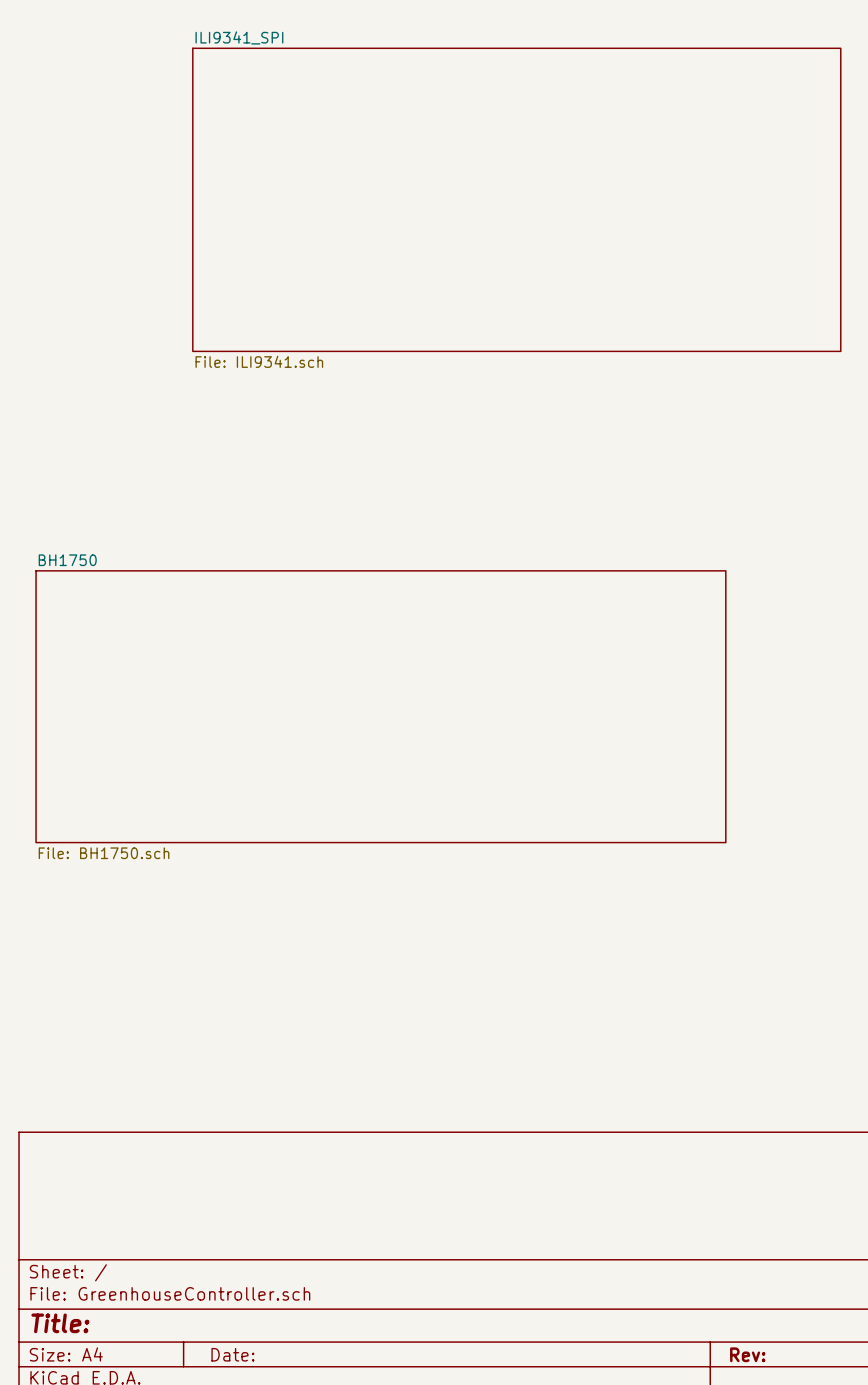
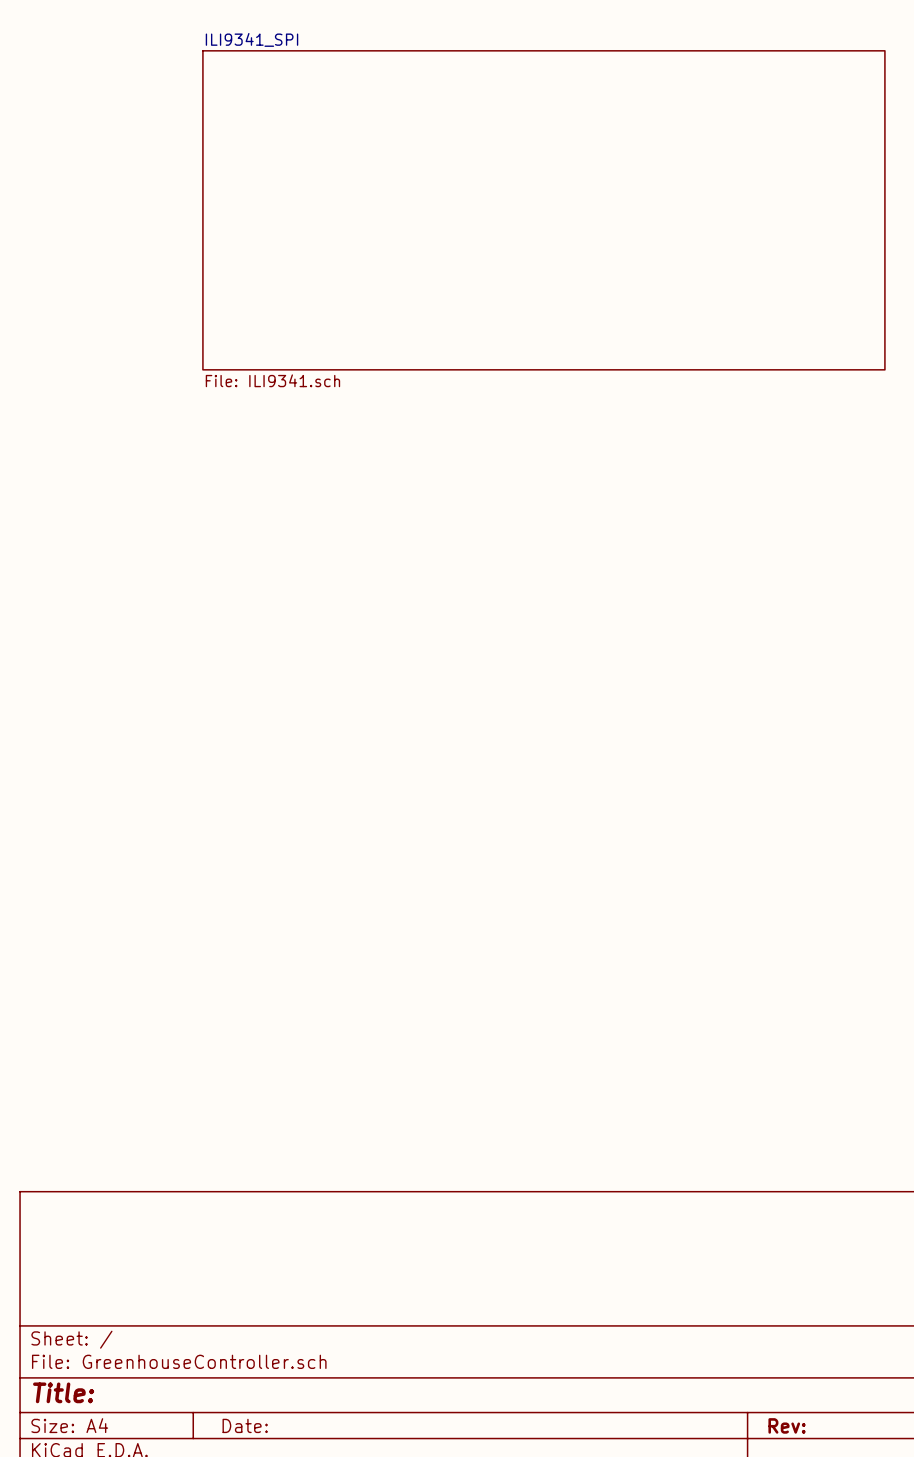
sheet BH1750: File: BH1750.sch (380, 706) -> none

